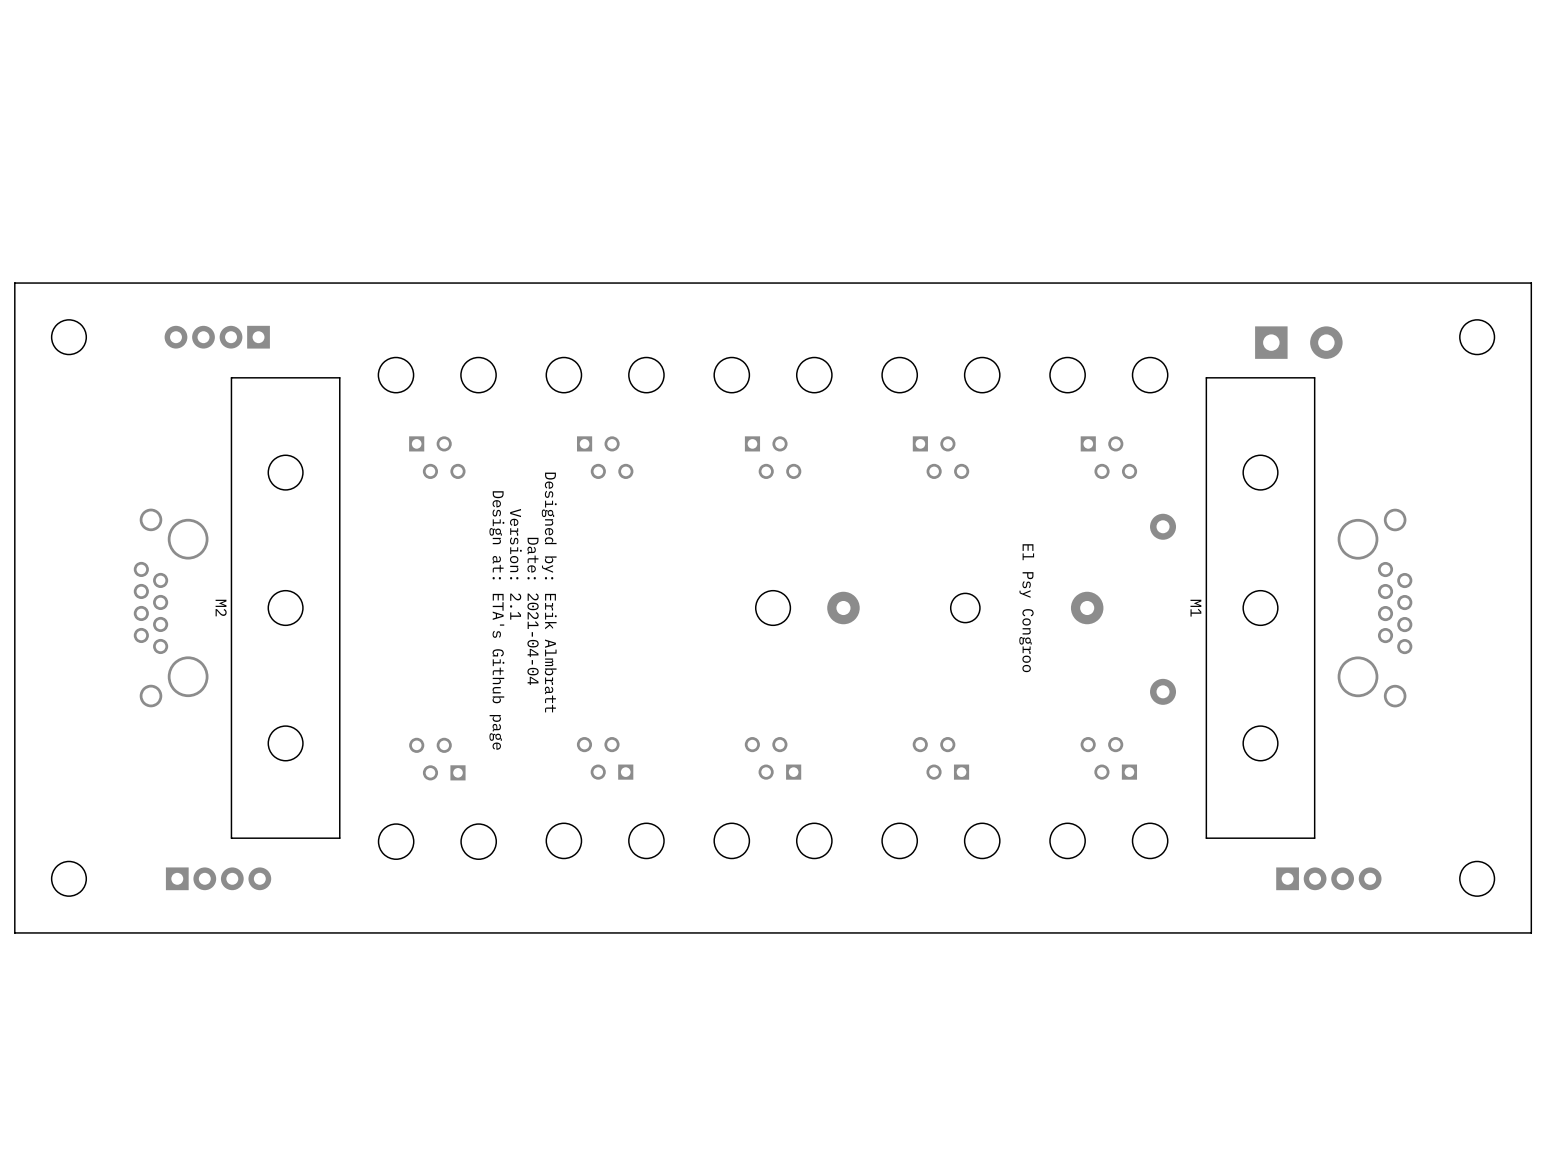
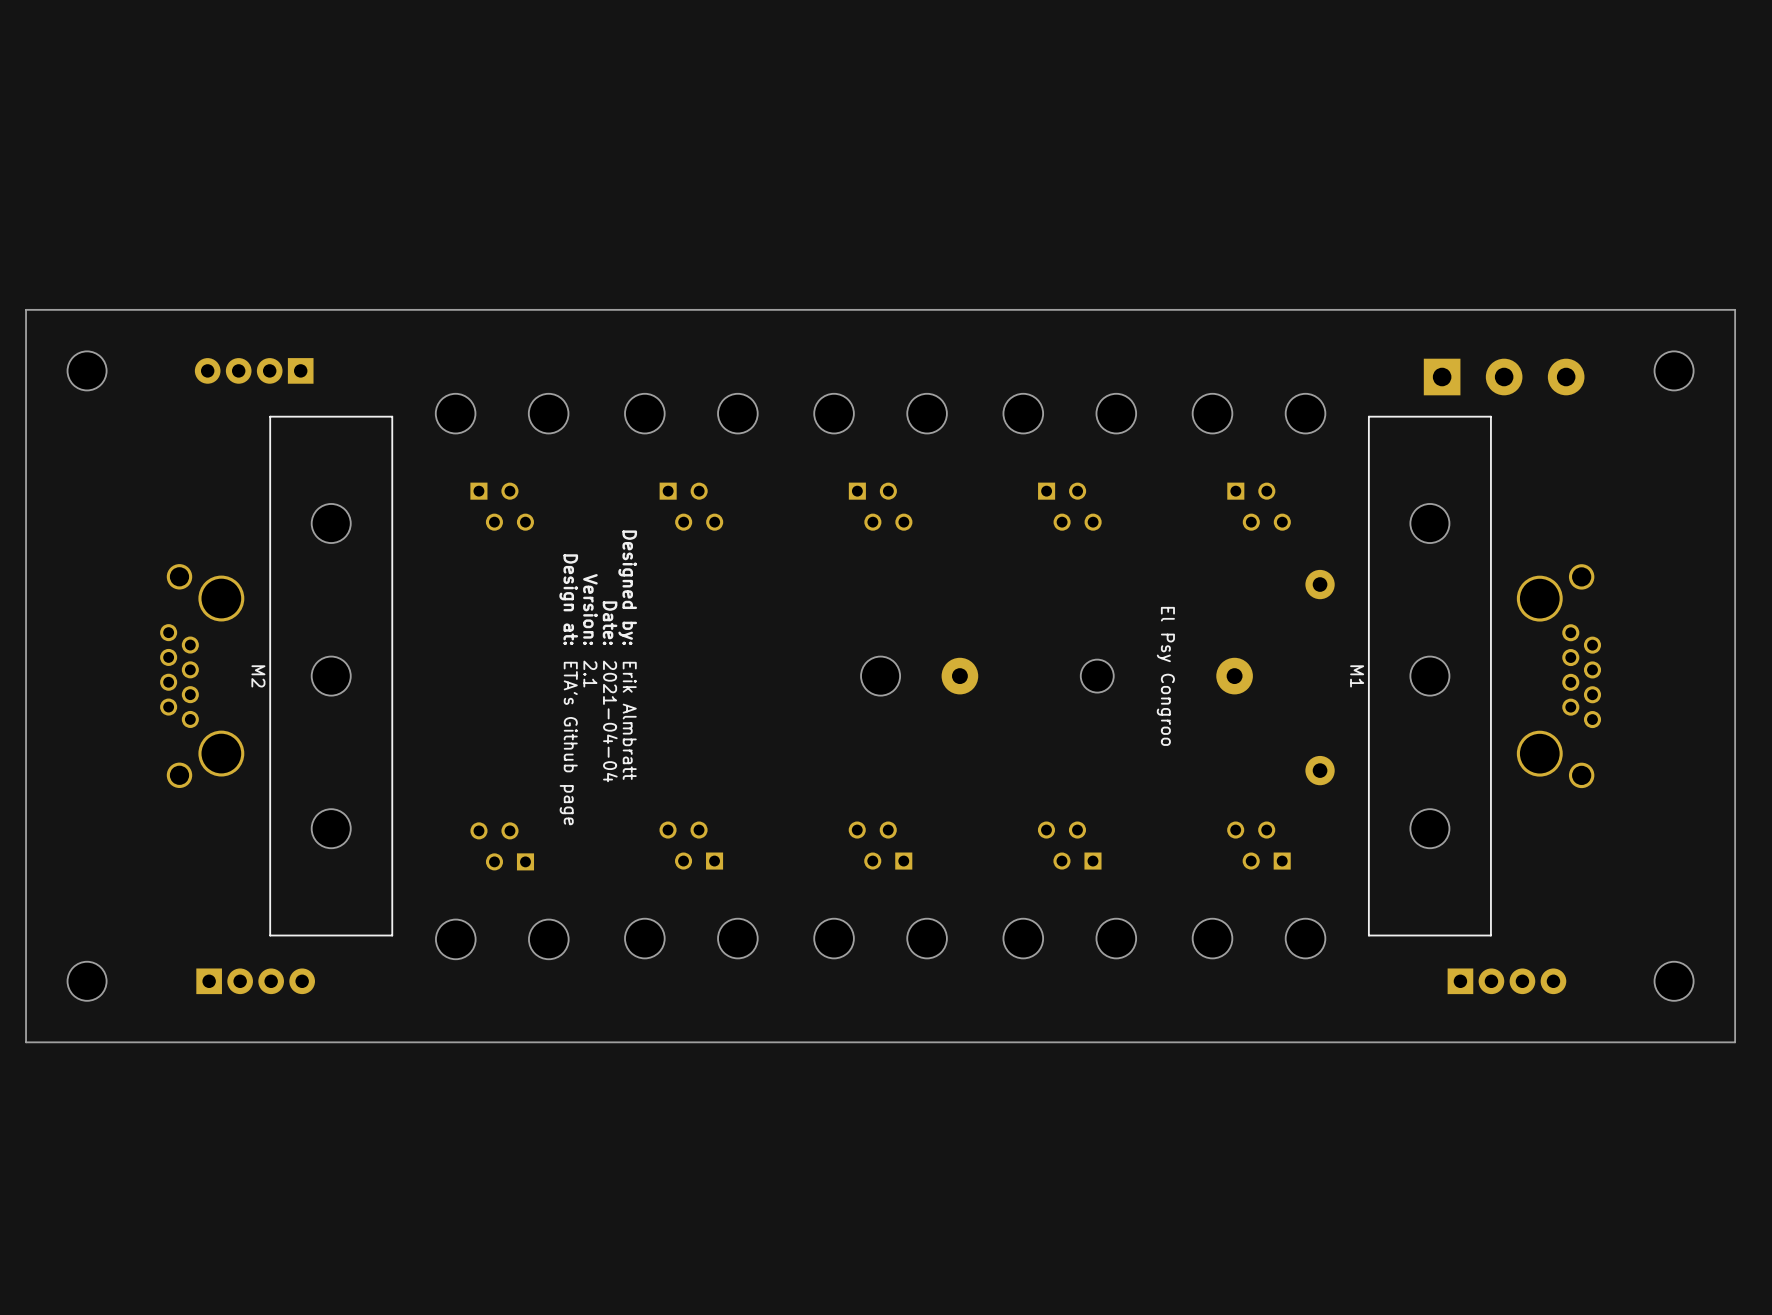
part: none -> (1504, 377)

